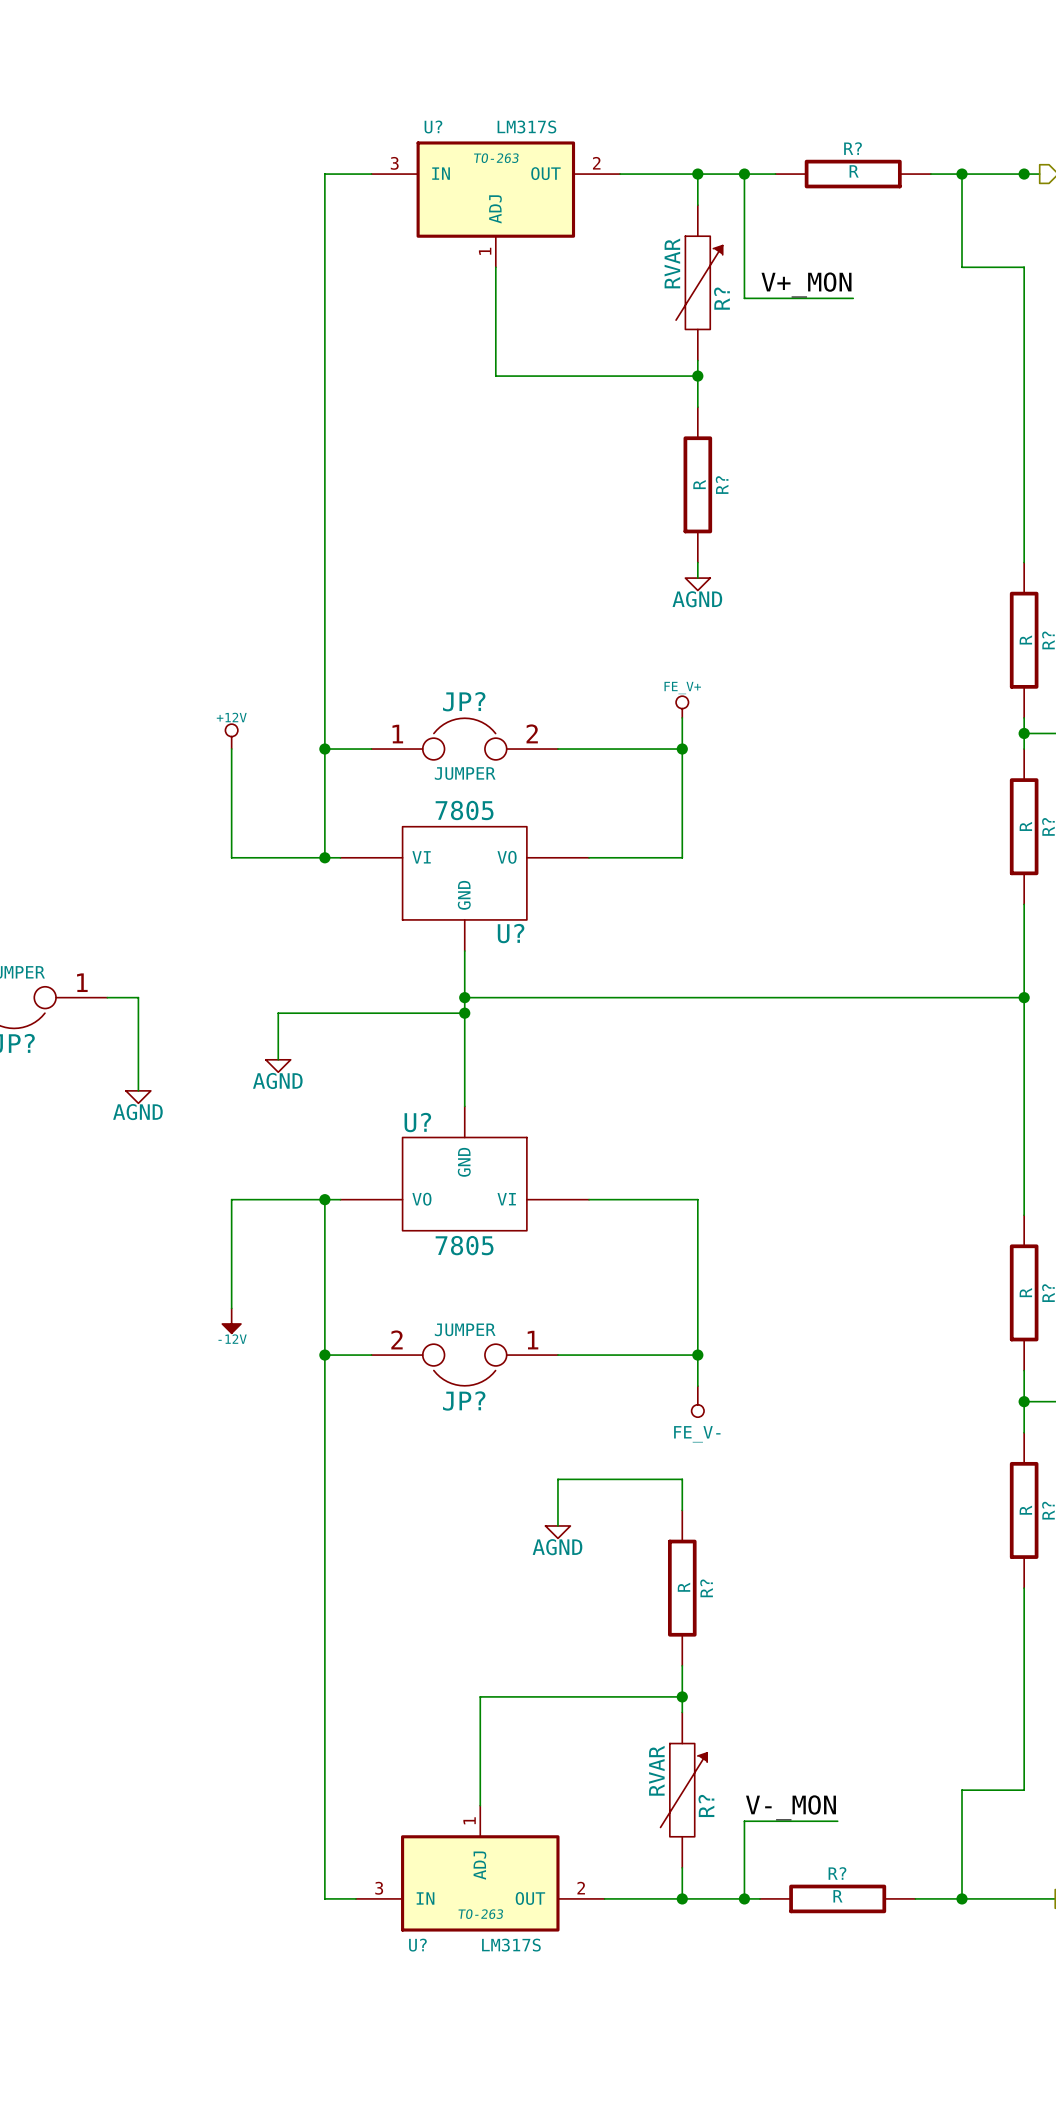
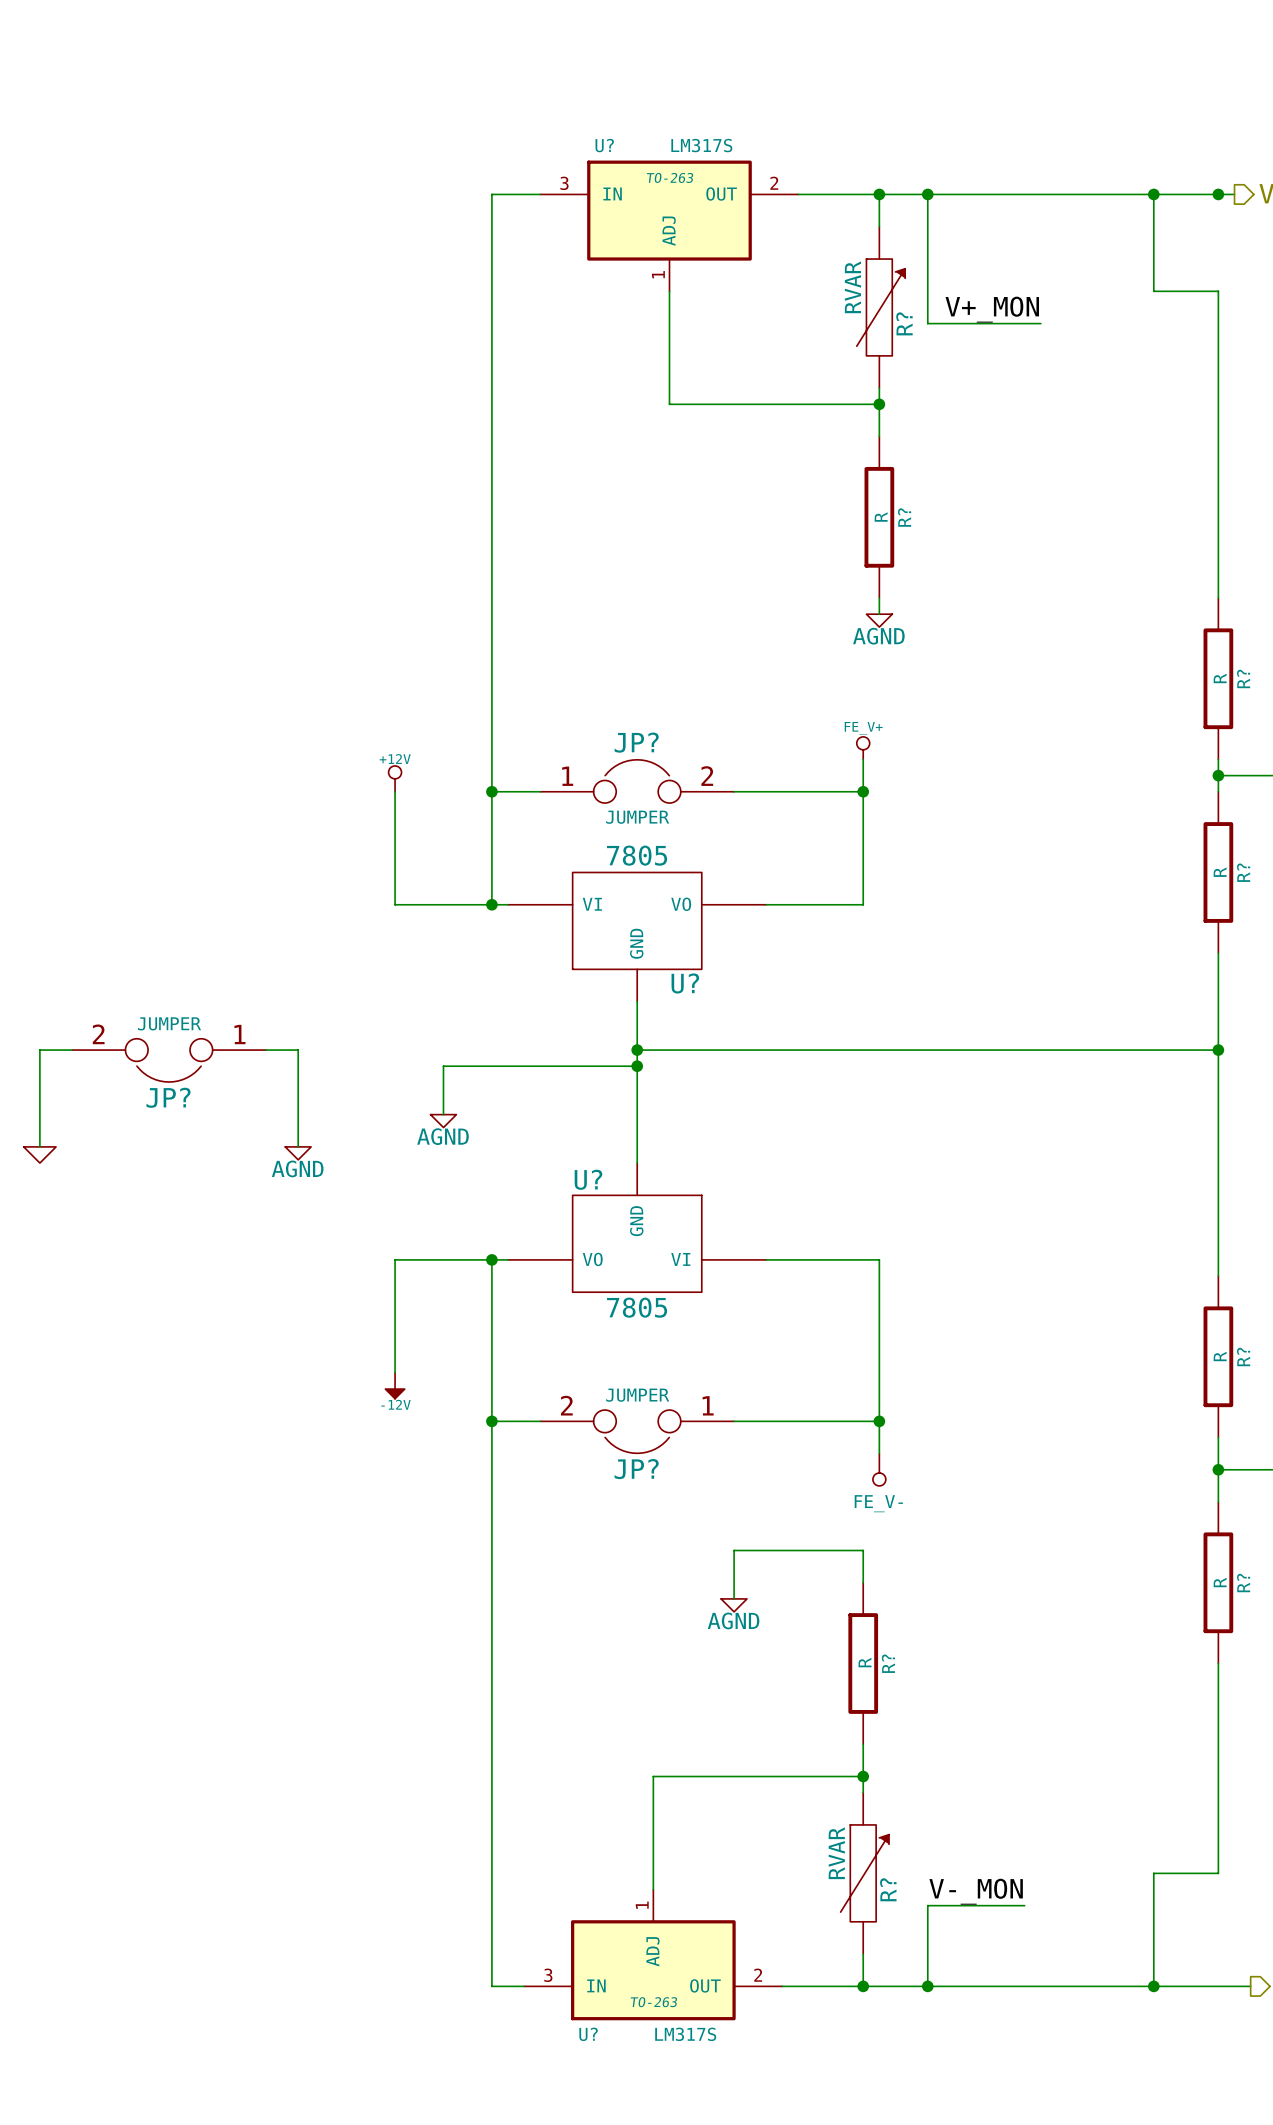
wire: none -> (960, 194) (1121, 194)
R?: R (853, 174) -> none
wire: none -> (943, 1986) (1105, 1986)
R?: R (837, 1898) -> none

